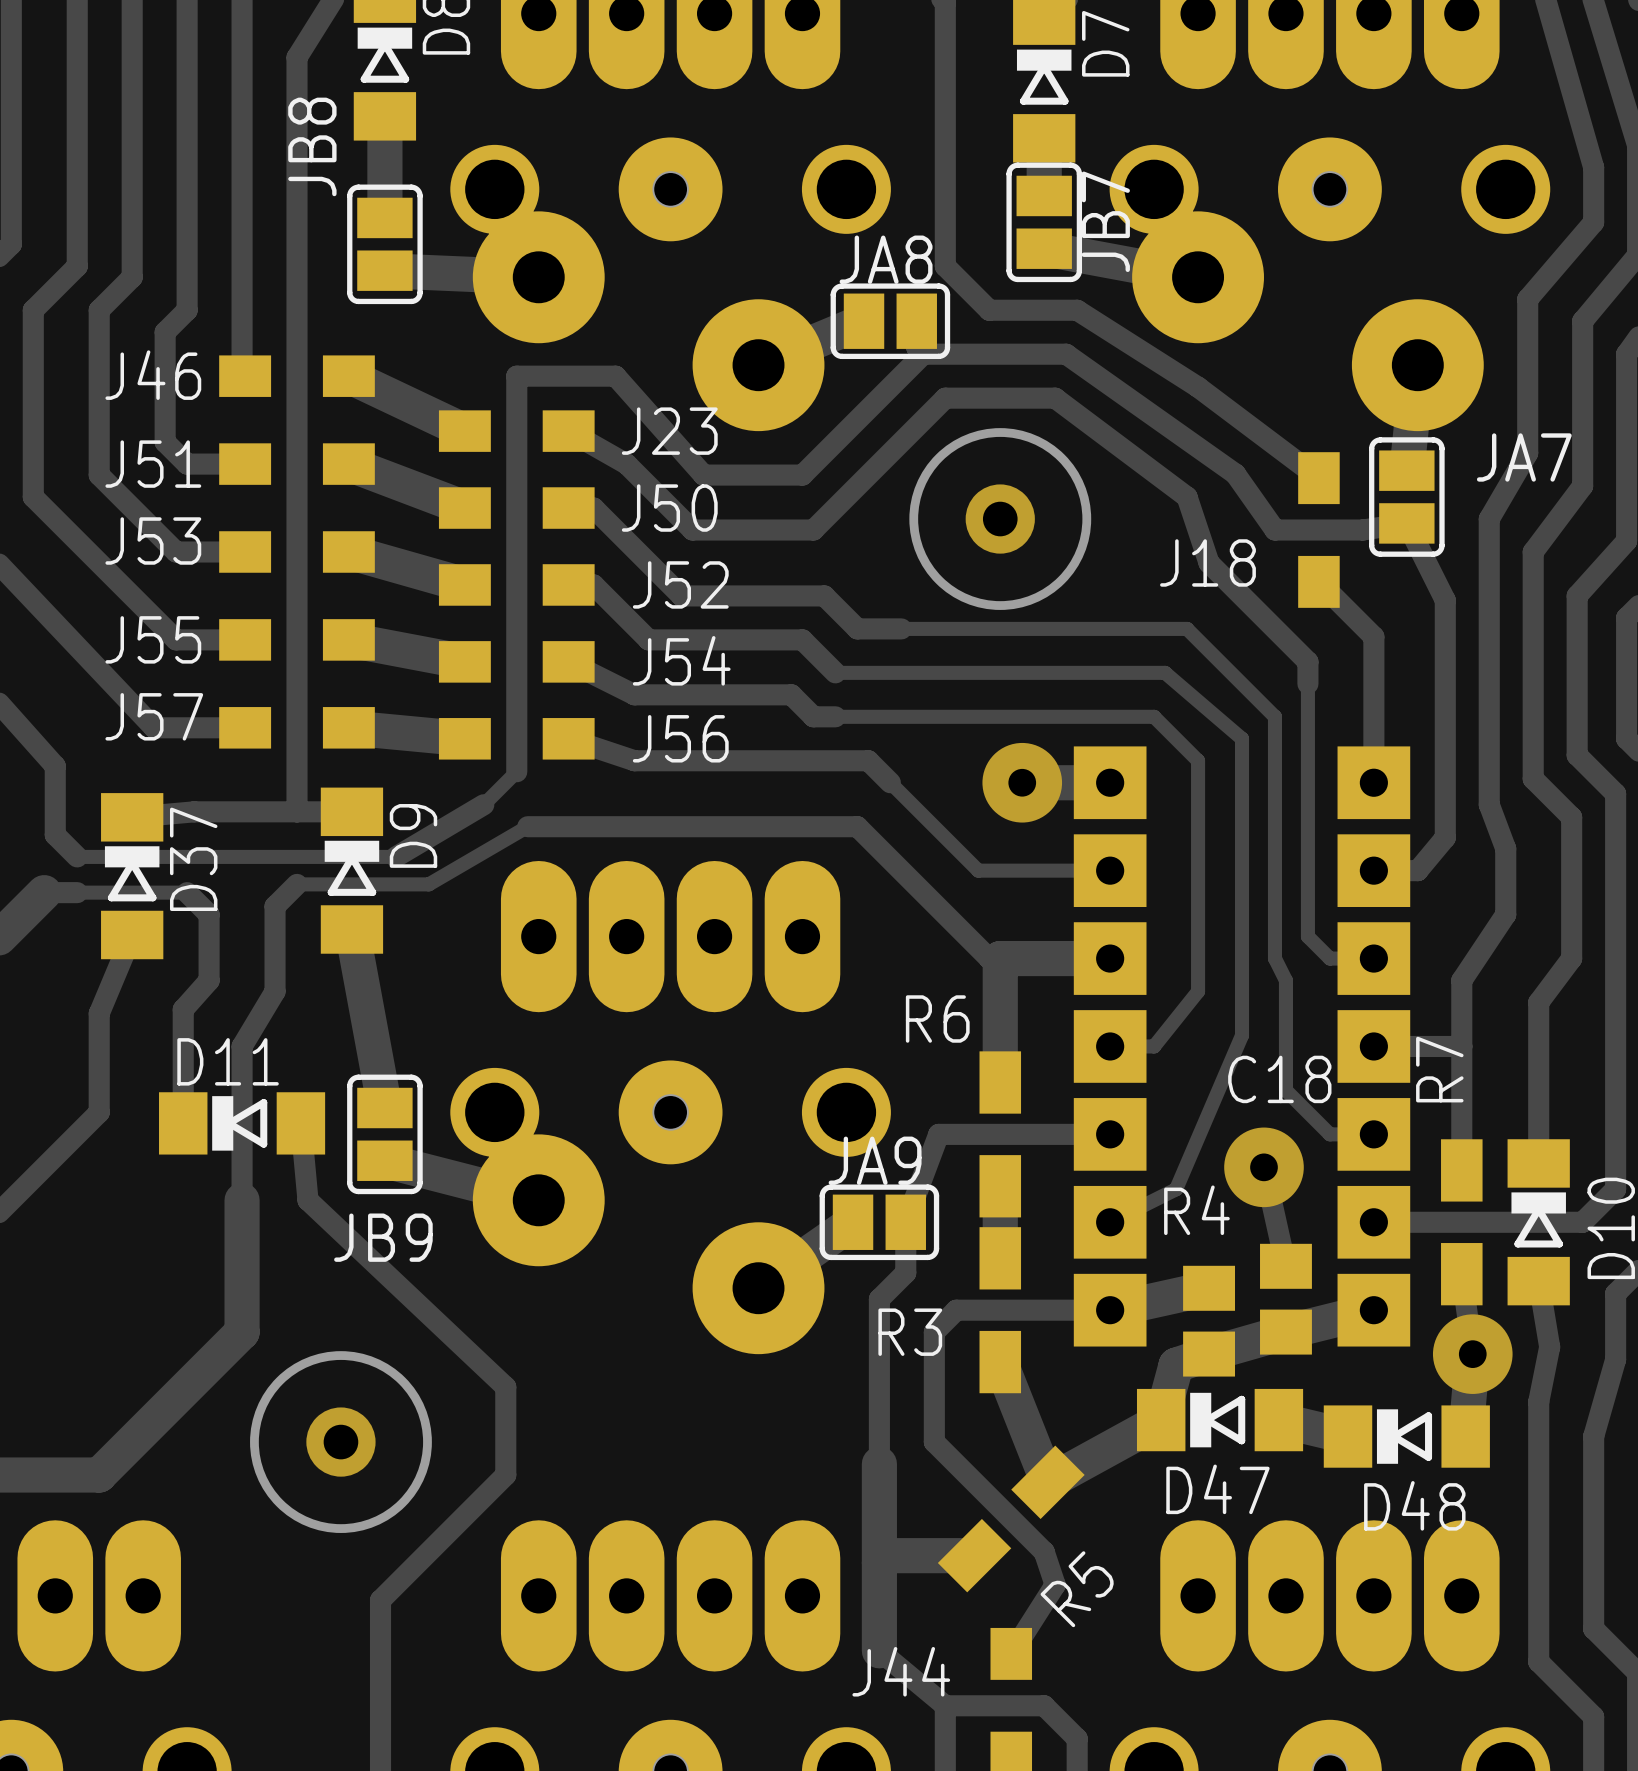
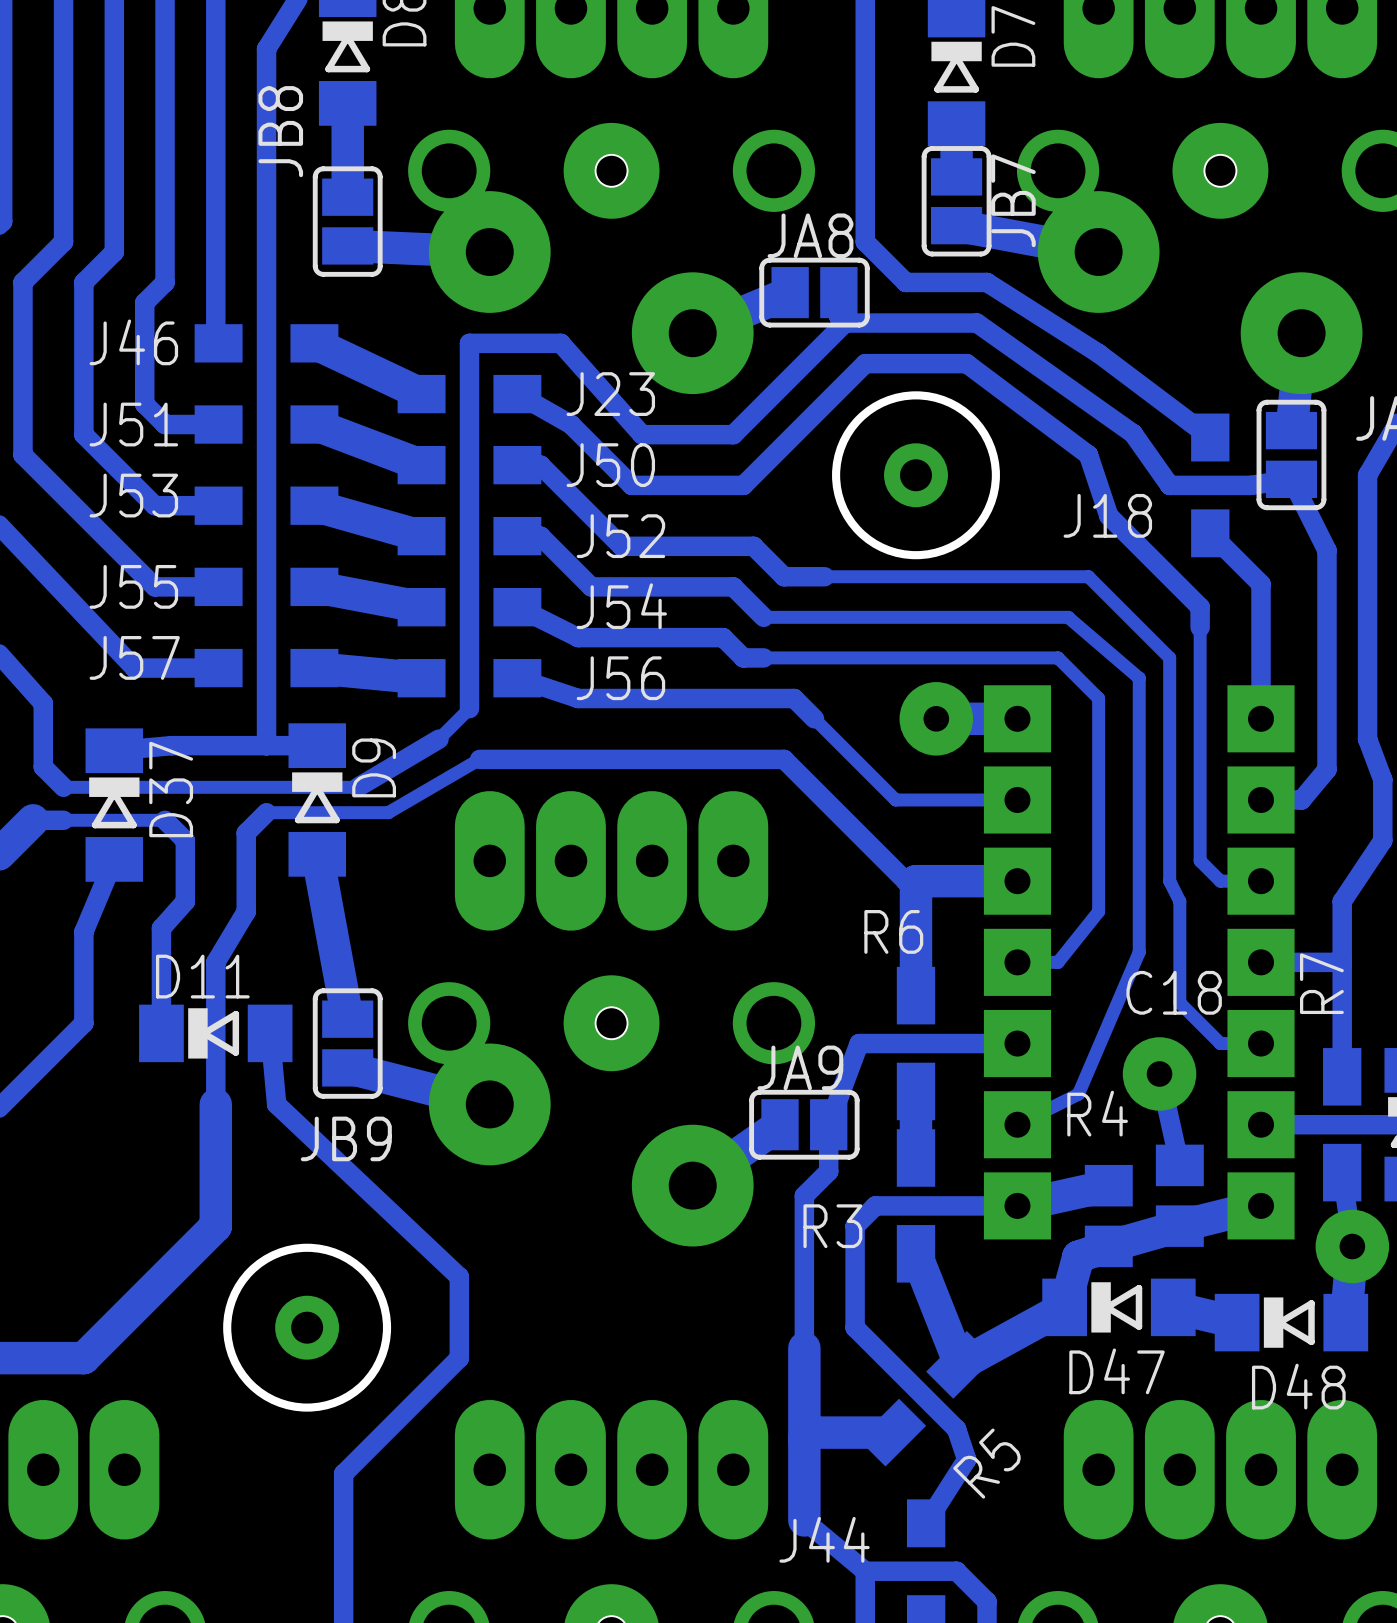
R6 name position: R6 (937, 1019) -> R6 (893, 931)

